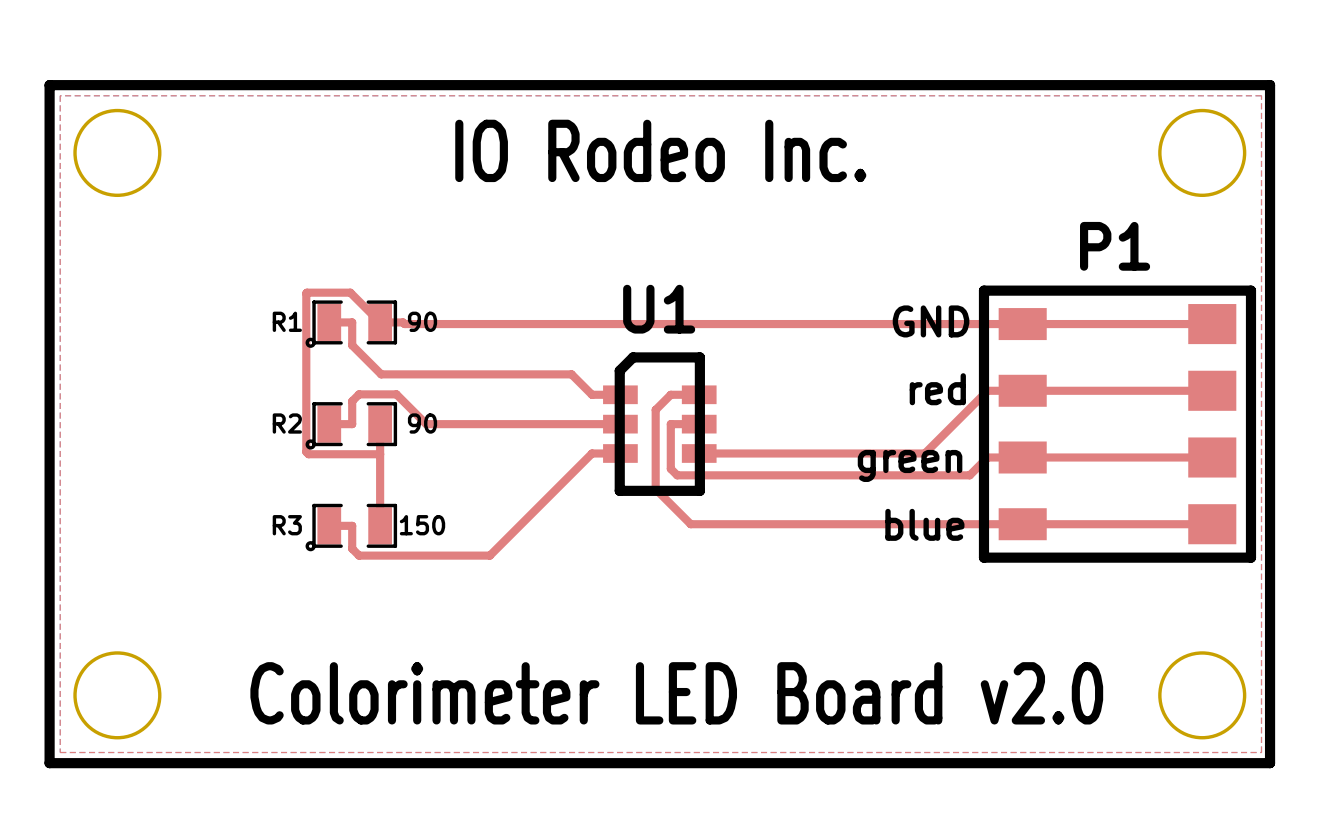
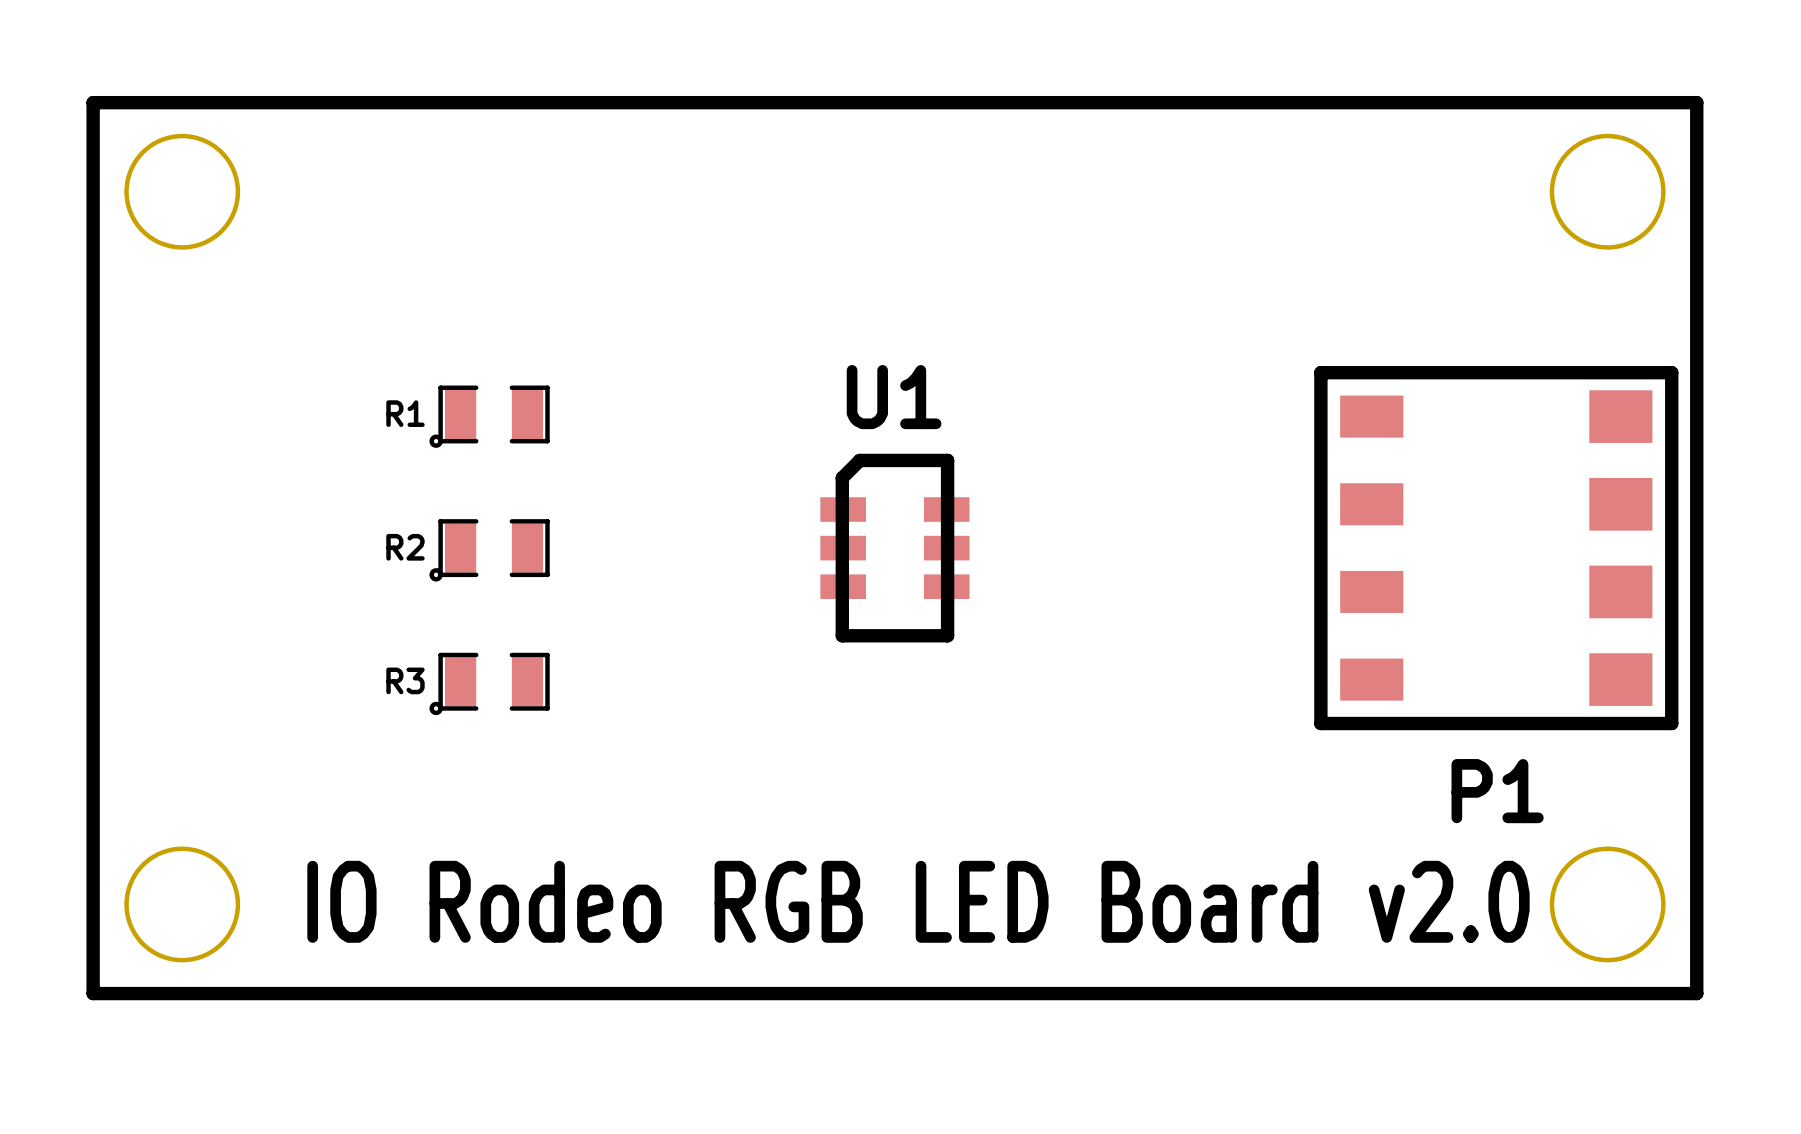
top zone outline: (60, 95) (1261, 95) (1261, 752) (60, 752) (60, 95) -> none
text: IO Rodeo Inc. (660, 150) -> none
P1 name position: P1 (1115, 246) -> P1 (1497, 791)
R1 value: 90 (422, 321) -> none
text: GND (931, 321) -> none
top track: (329, 322) (352, 322) (352, 345) (381, 374) (571, 374) (592, 394) (620, 394) -> none
top track: (1212, 324) (404, 324) (403, 322) (380, 322) (350, 292) (306, 292) (306, 451) (308, 454) (380, 454) -> none
text: red (937, 389) -> none
top track: (1212, 390) (987, 390) (924, 453) (699, 453) -> none
top track: (699, 394) (670, 394) (655, 409) (655, 489) (690, 524) (1212, 524) -> none
R2 value: 90 (422, 423) -> none
top track: (329, 424) (352, 424) (352, 401) (359, 394) (396, 394) (426, 424) (620, 424) -> none
top track: (380, 424) (380, 525) -> none
top track: (699, 424) (670, 424) (670, 468) (677, 475) (969, 475) (987, 457) (1212, 457) -> none
top track: (620, 453) (592, 453) (489, 555) (359, 555) (352, 548) (352, 525) (329, 525) -> none
text: green (910, 465) -> none
text: blue (924, 524) -> none
R3 value: 150 (422, 525) -> none
text: Colorimeter LED Board v2.0 (676, 693) -> IO Rodeo RGB LED Board v2.0 (918, 901)

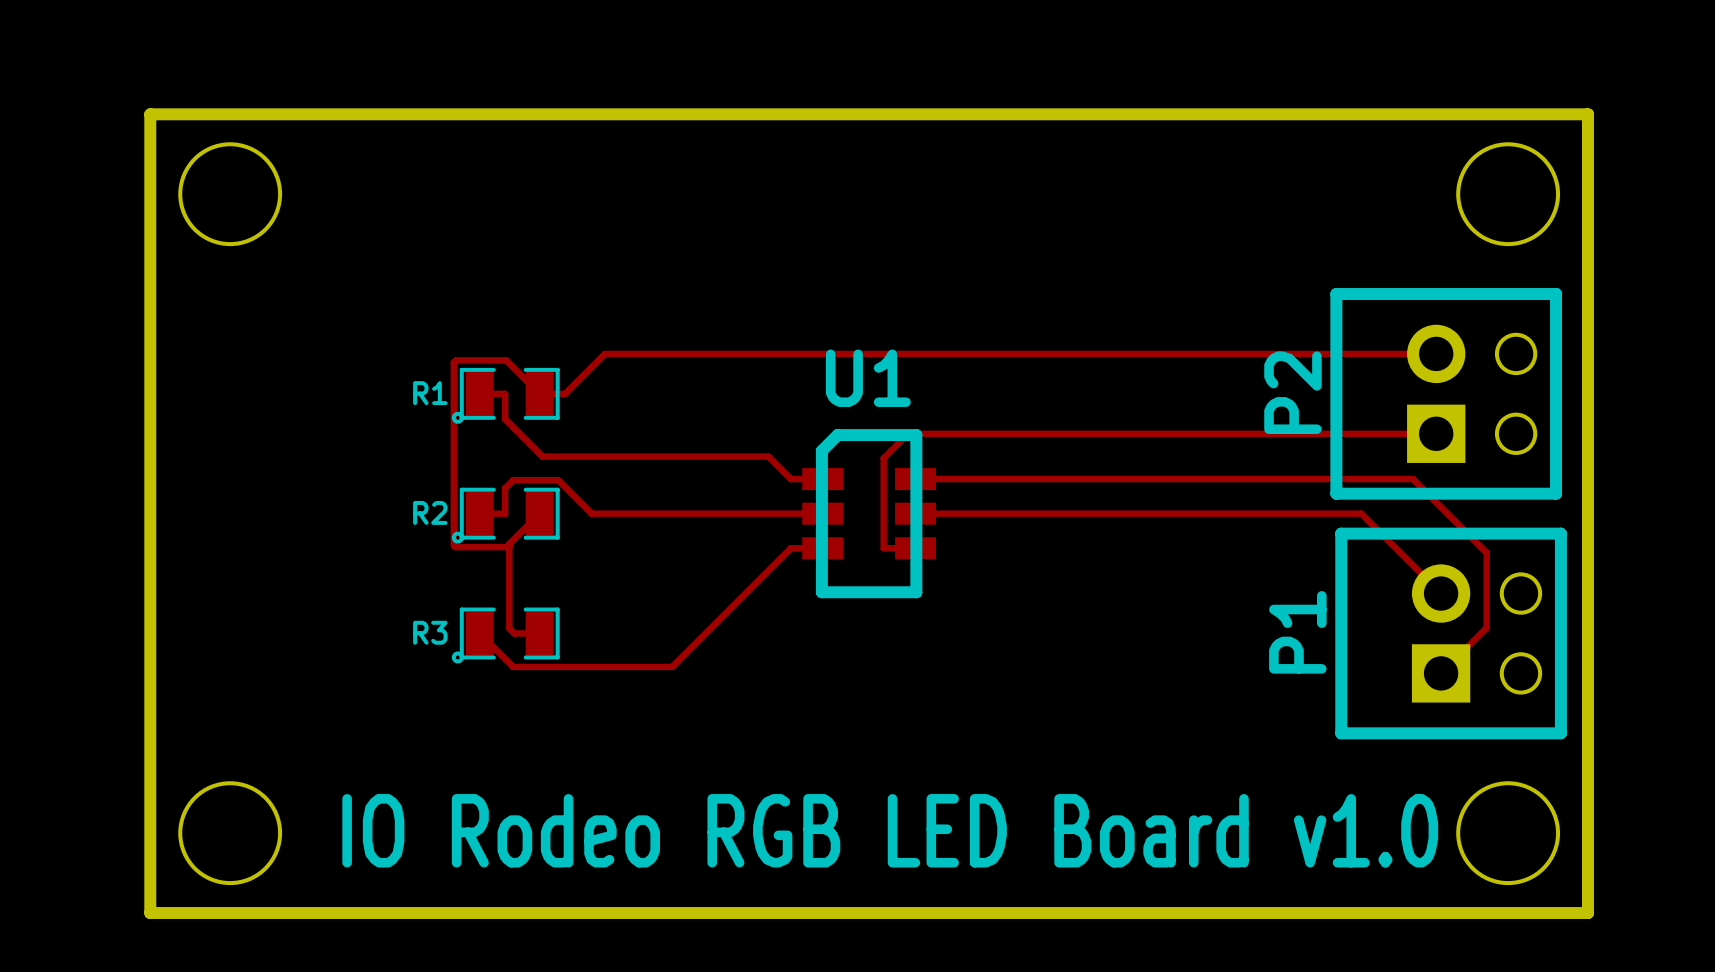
P1 footprint: [1314, 366, 1679, 731] -> [1335, 527, 1567, 740]
top track: none -> (1436, 353) (605, 353) (565, 393) (539, 393) (506, 360) (456, 360) (453, 362) (453, 545) (455, 547) (509, 547)
top track: none -> (479, 393) (505, 393) (505, 419) (542, 456) (768, 456) (790, 479) (822, 479)
P2: none -> (1446, 393)
top track: none -> (1436, 433) (908, 433) (883, 458) (883, 548) (915, 548)
top track: none -> (915, 479) (1412, 479) (1486, 552) (1486, 627) (1441, 673)
top track: none -> (479, 513) (505, 513) (505, 488) (513, 480) (558, 480) (591, 513) (822, 513)
top track: none -> (539, 513) (509, 544) (509, 628) (514, 633) (539, 633)
top track: none -> (915, 513) (1361, 513) (1441, 593)
top track: none -> (822, 548) (790, 548) (672, 666) (513, 666) (479, 633)
P1 name position: P1 (1497, 791) -> P1 (1297, 632)
text: IO Rodeo RGB LED Board v2.0 (918, 901) -> IO Rodeo RGB LED Board v1.0 (890, 830)

